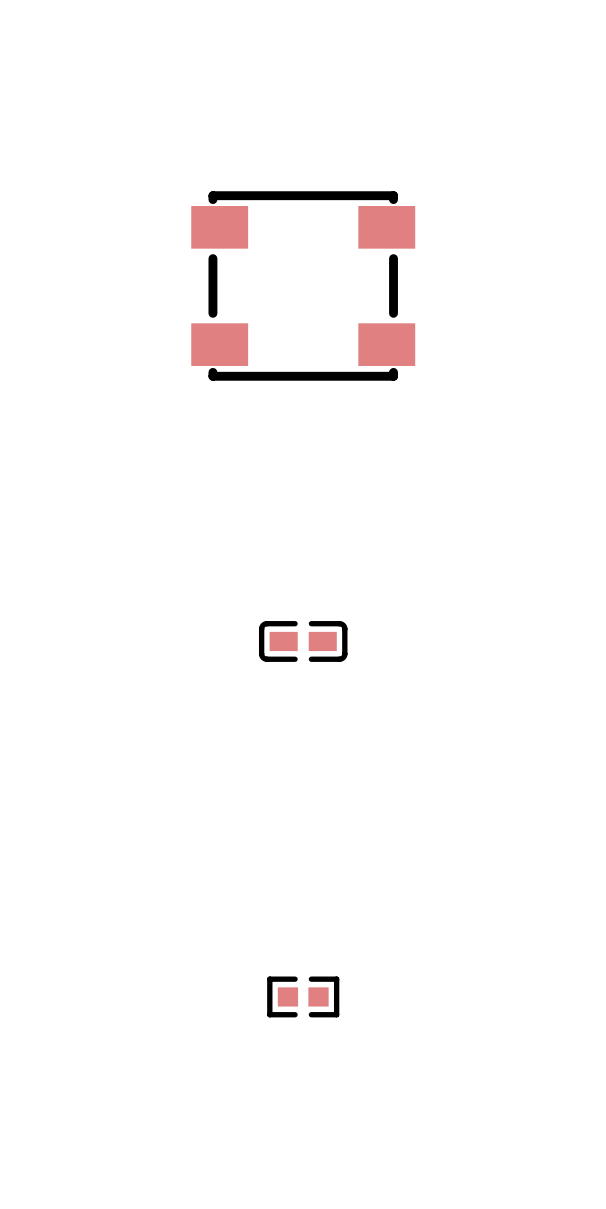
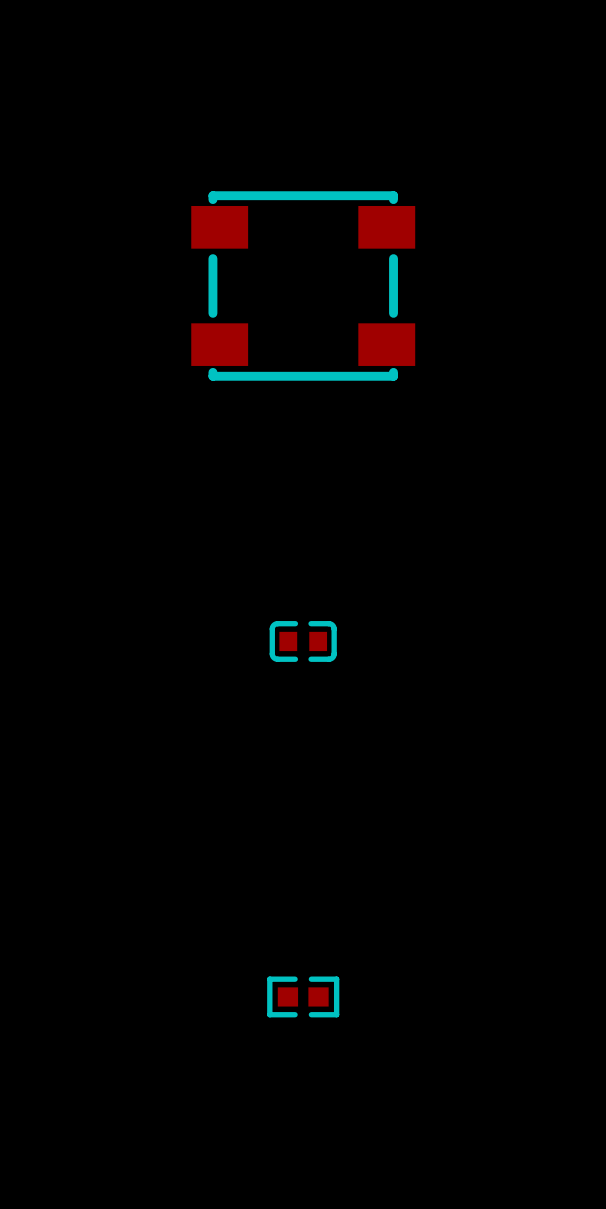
part footprint: [258, 621, 348, 662] -> [269, 621, 337, 662]

